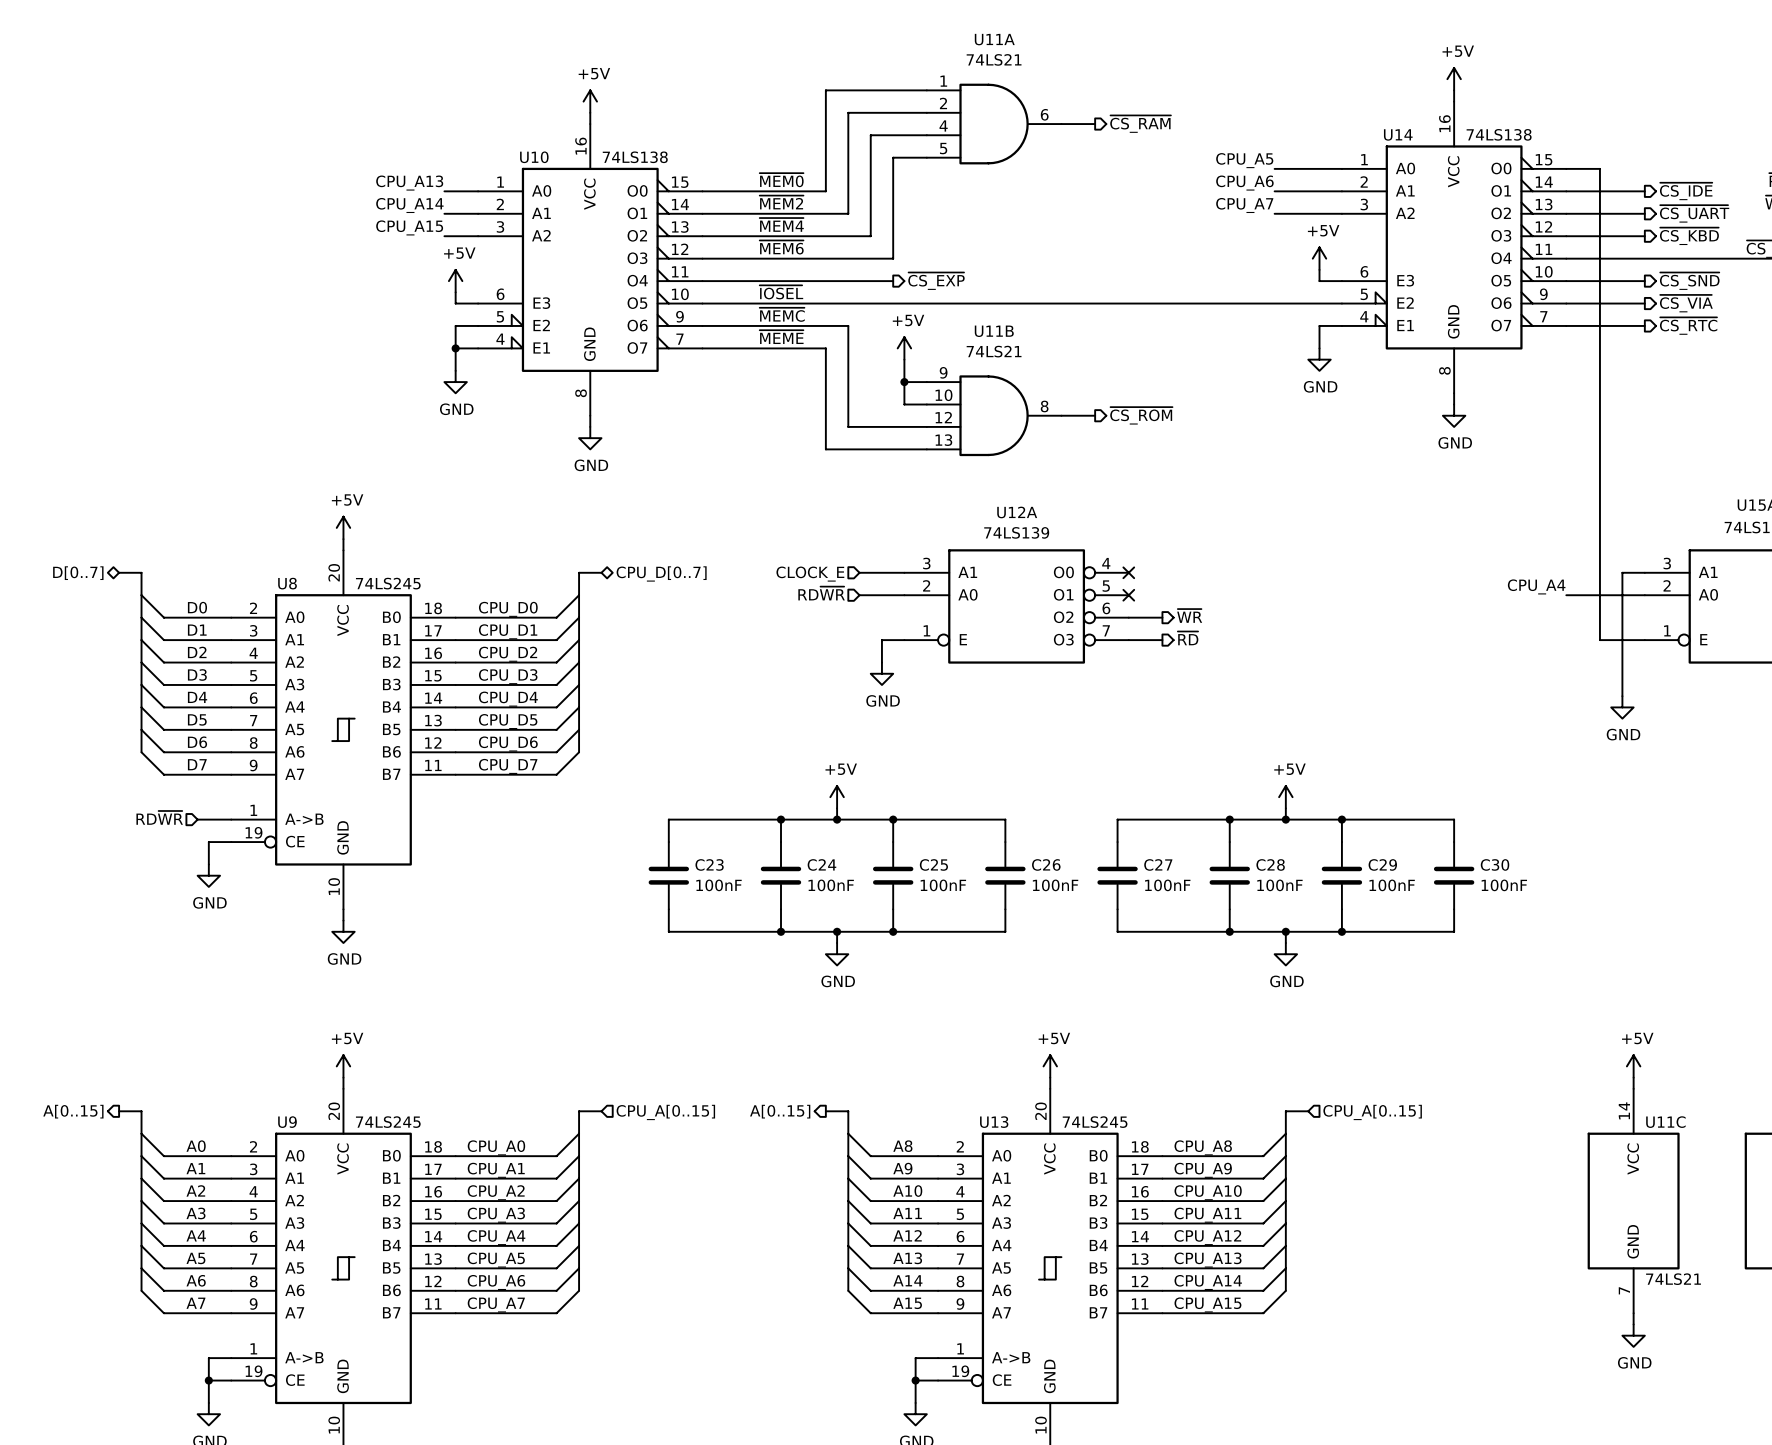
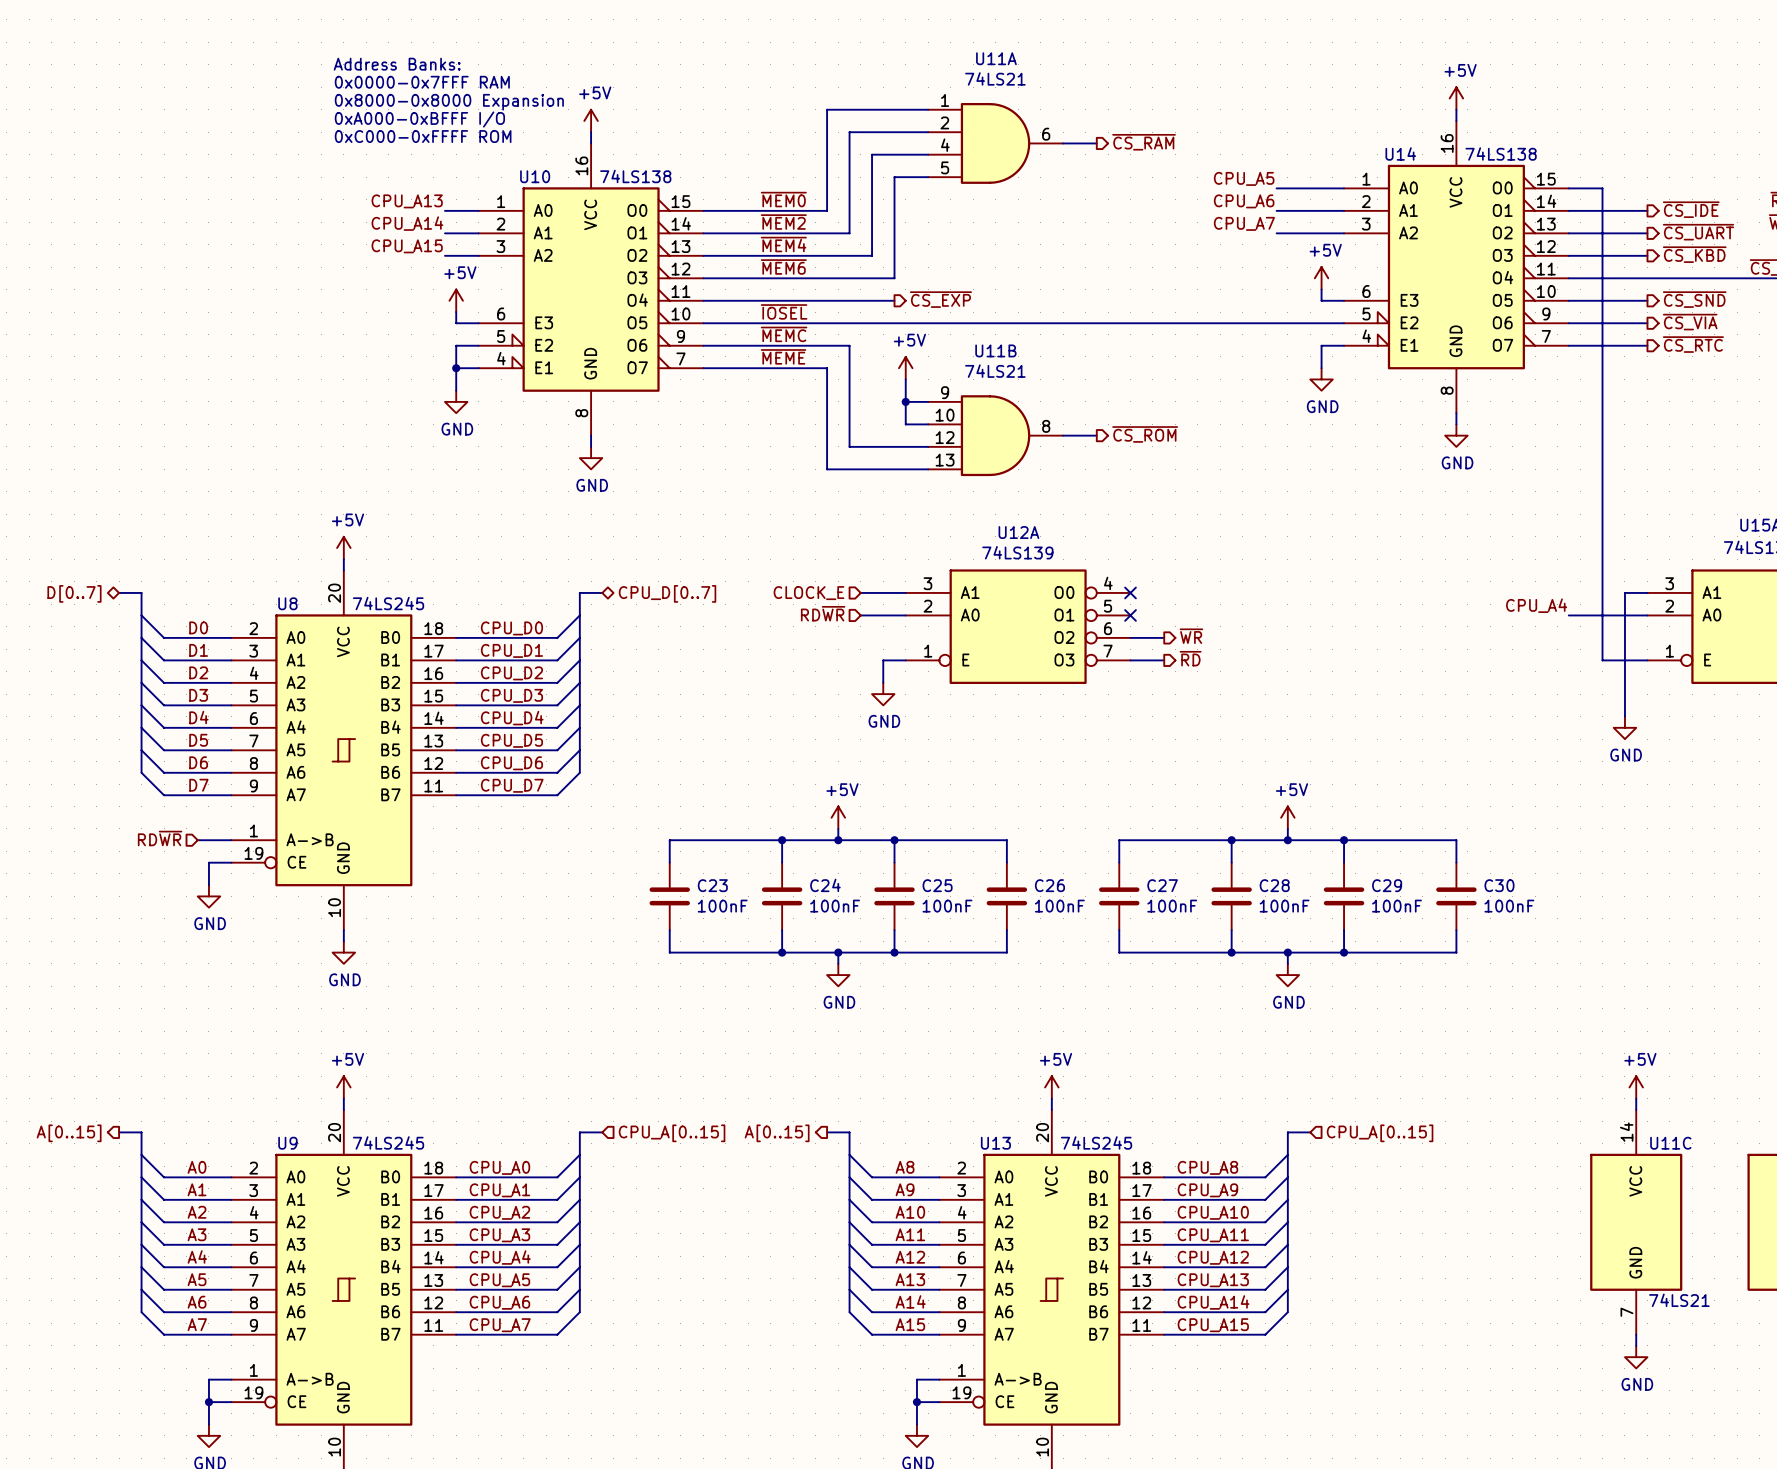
text: none -> Address Banks: (397, 64)
text: none -> 0x0000-0x7FFF RAM (422, 82)
text: none -> 0x8000-0x8000 Expansion (449, 102)
text: none -> 0xA000-0xBFFF I/O (419, 119)
text: none -> 0xC000-0xFFFF ROM (423, 136)

